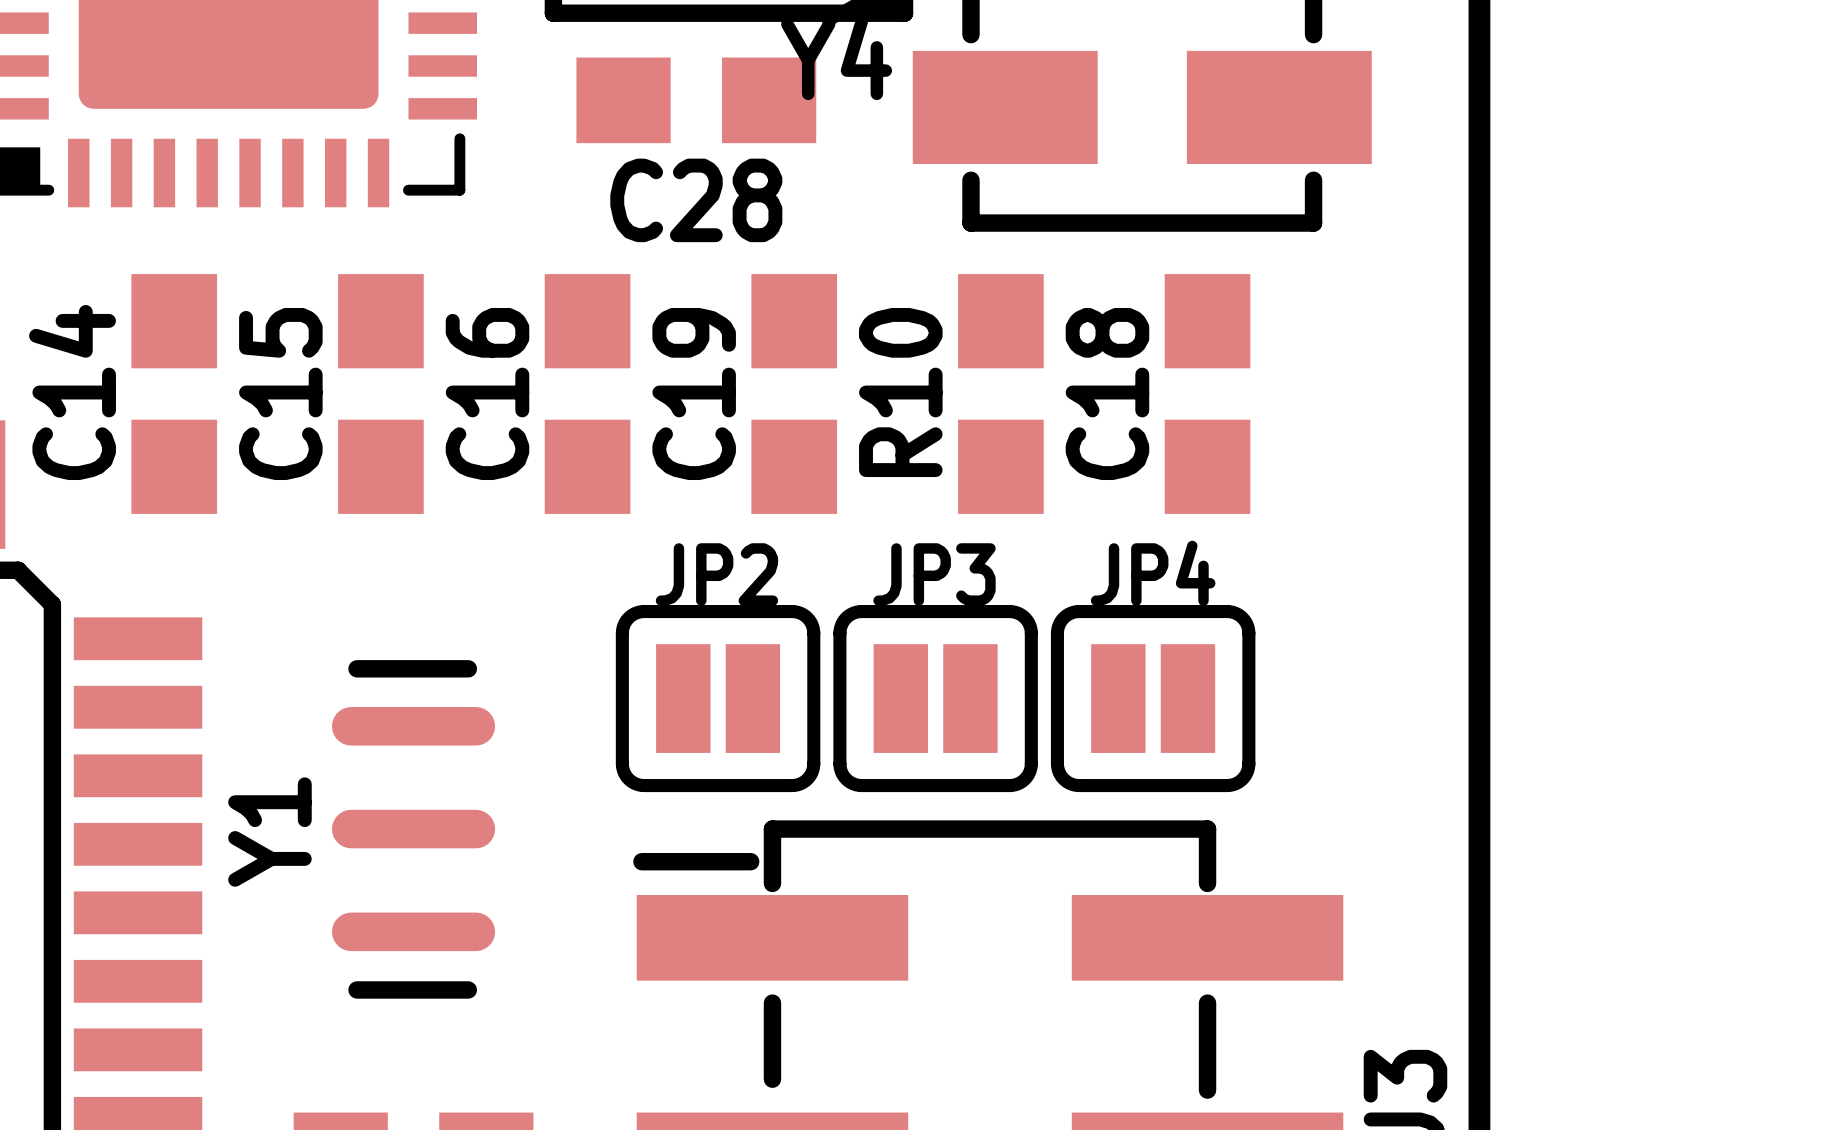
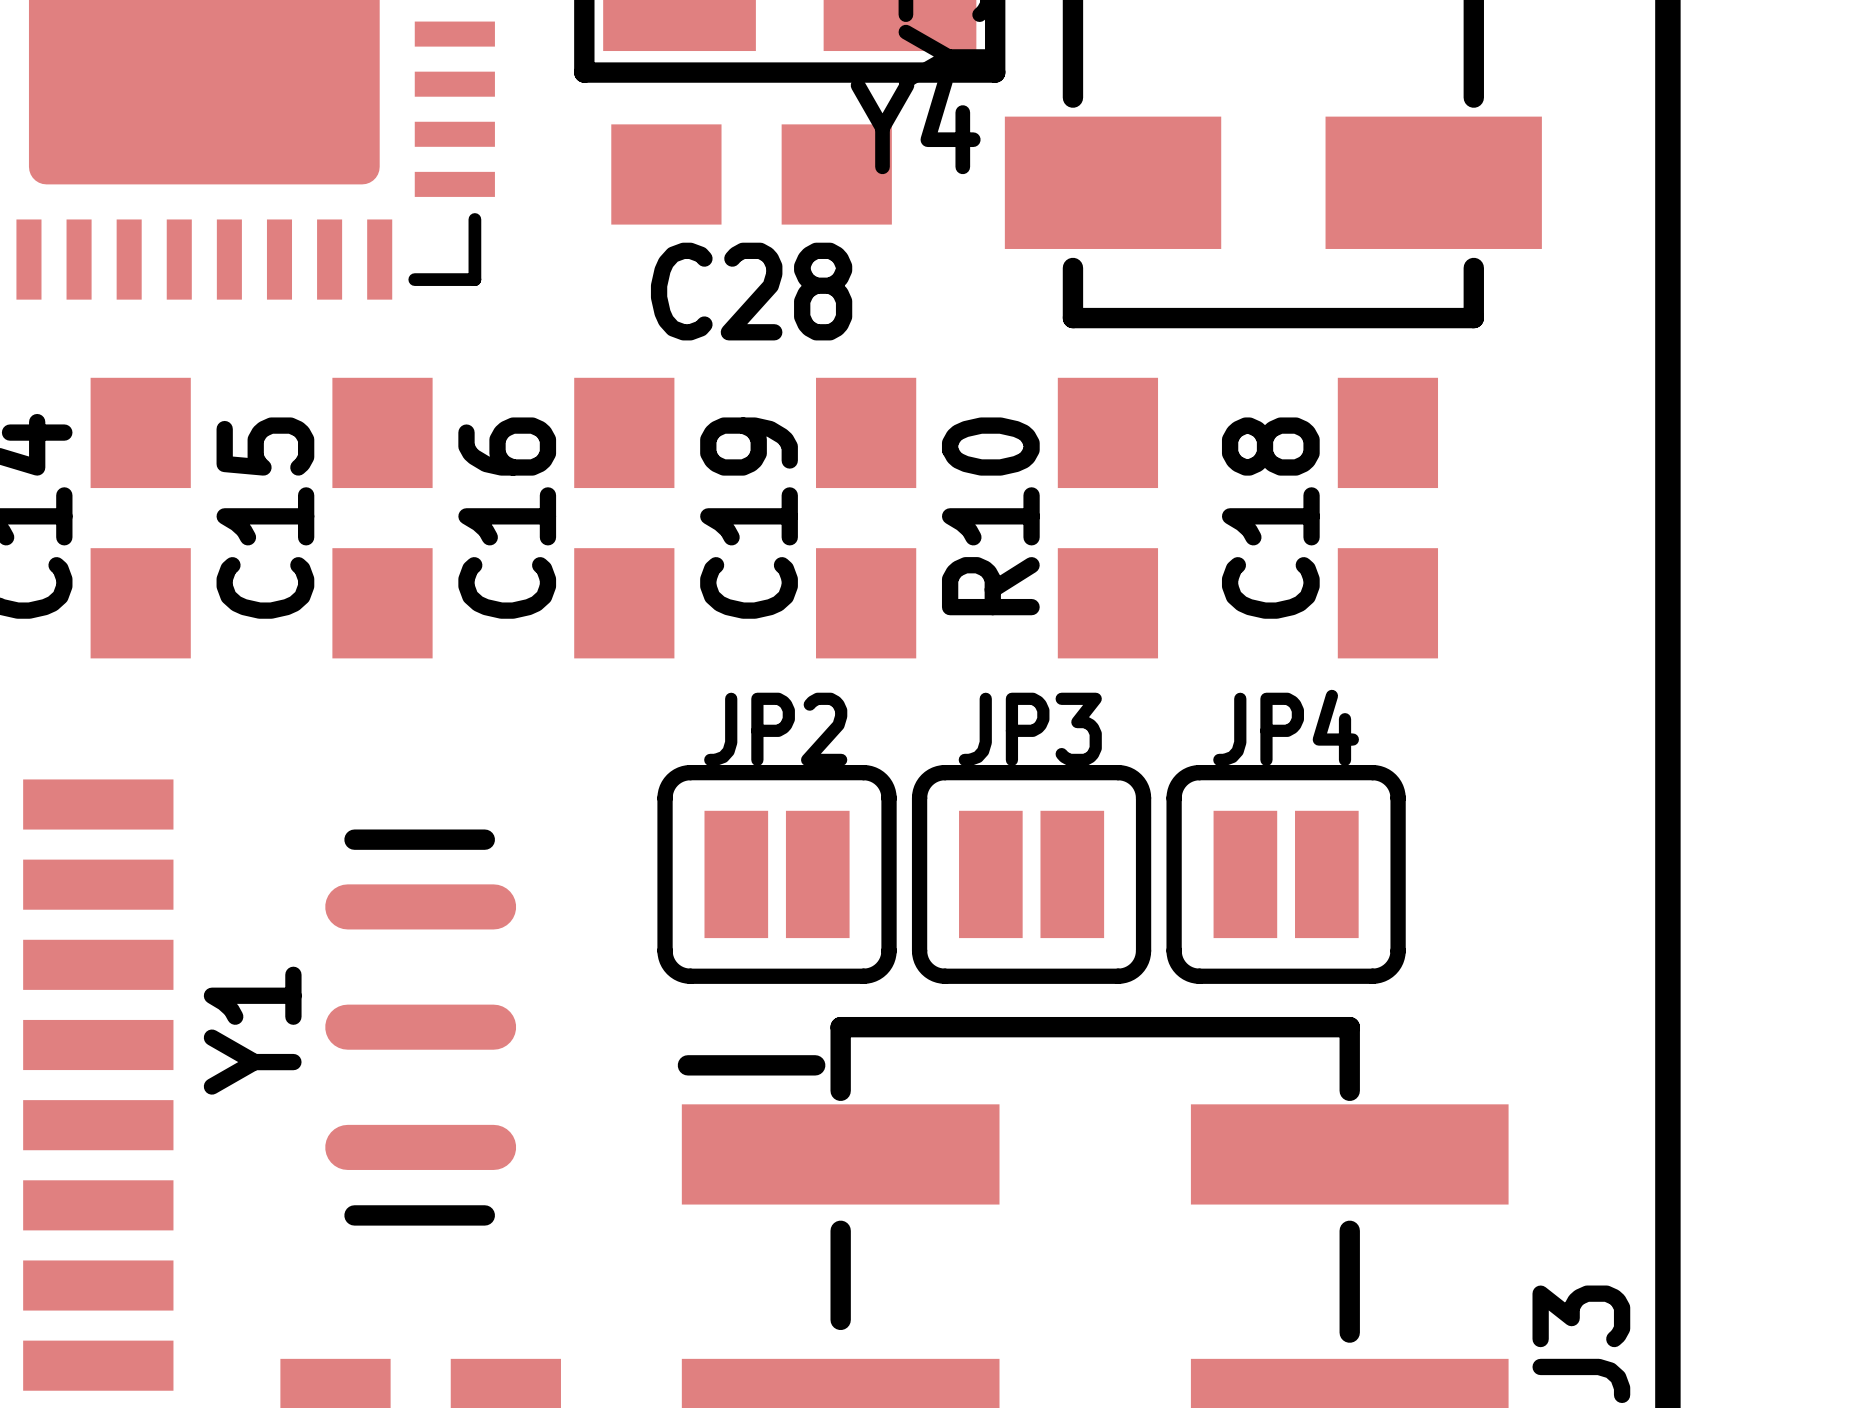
C18 position: (1207, 394) -> (1387, 518)

